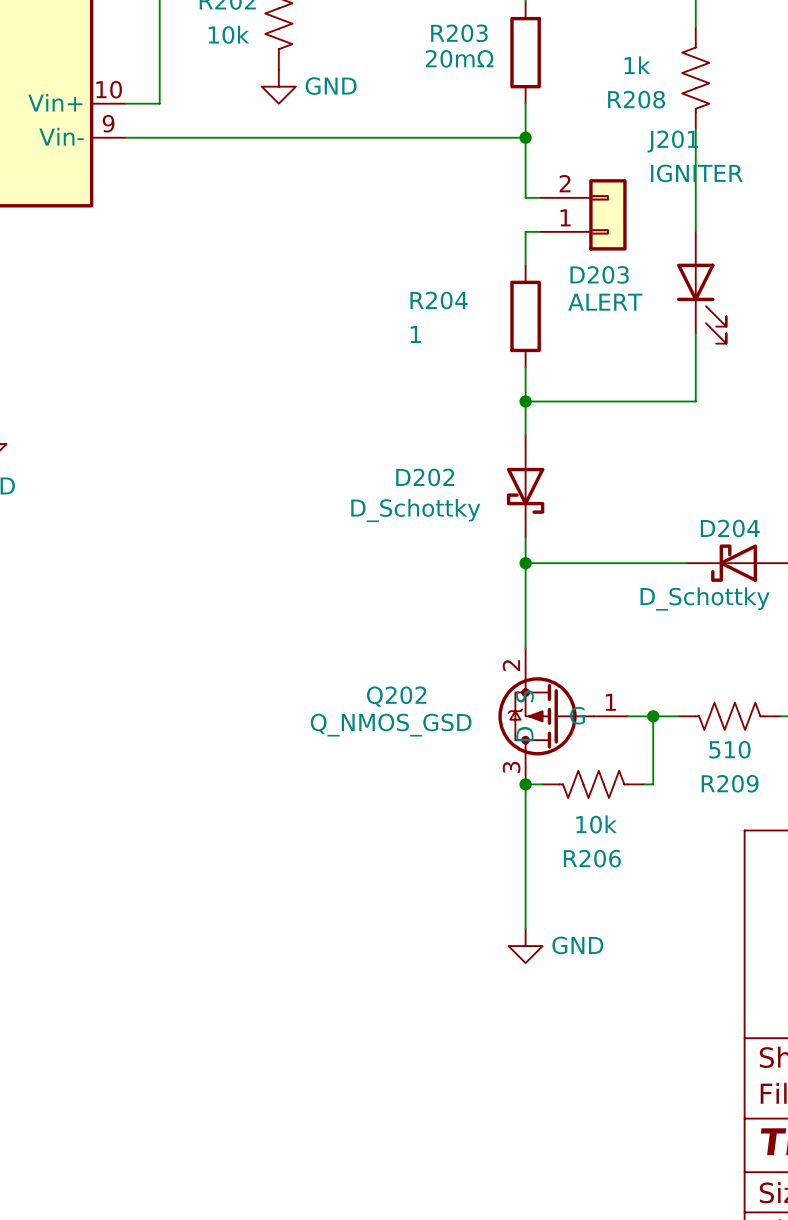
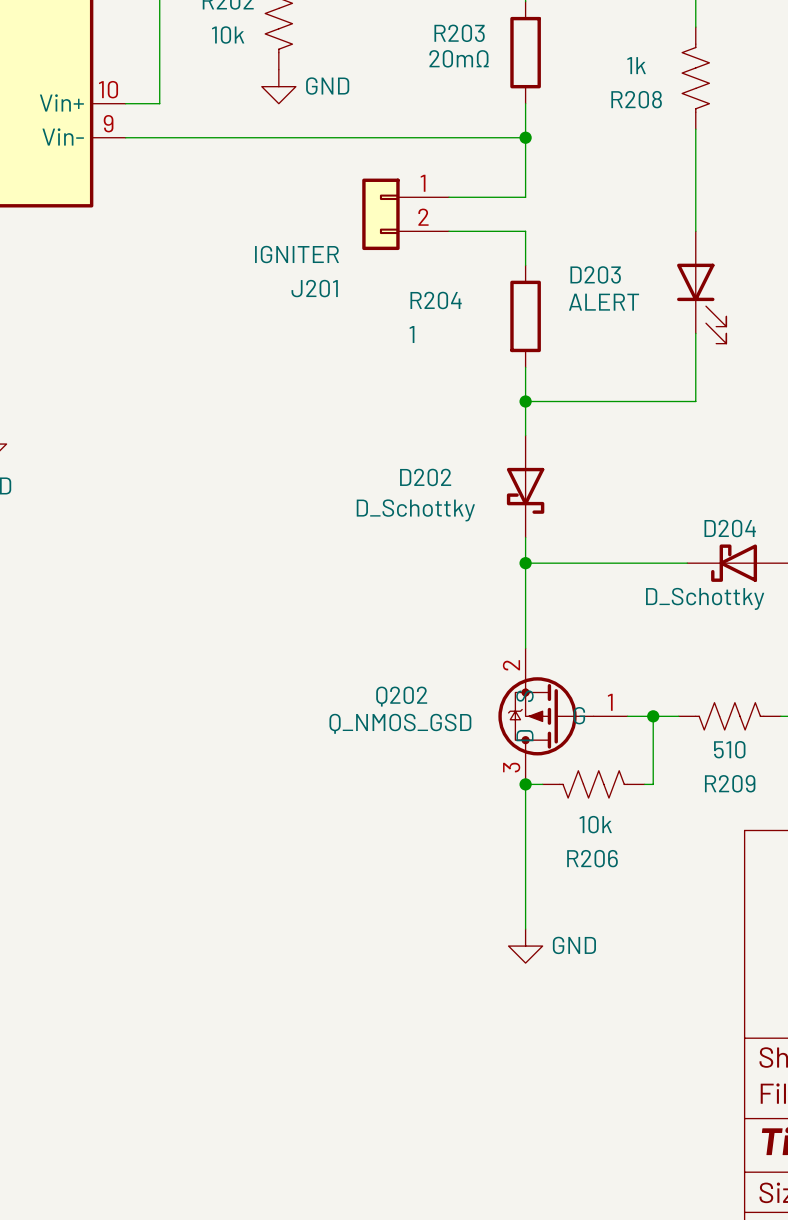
wire: (525, 197) (539, 197) -> (525, 197) (449, 197)
J201 position: (583, 214) -> (405, 214)
J201 rotation: 0° (607, 214) -> 180° (380, 214)
wire: (525, 231) (539, 231) -> (525, 231) (449, 231)

